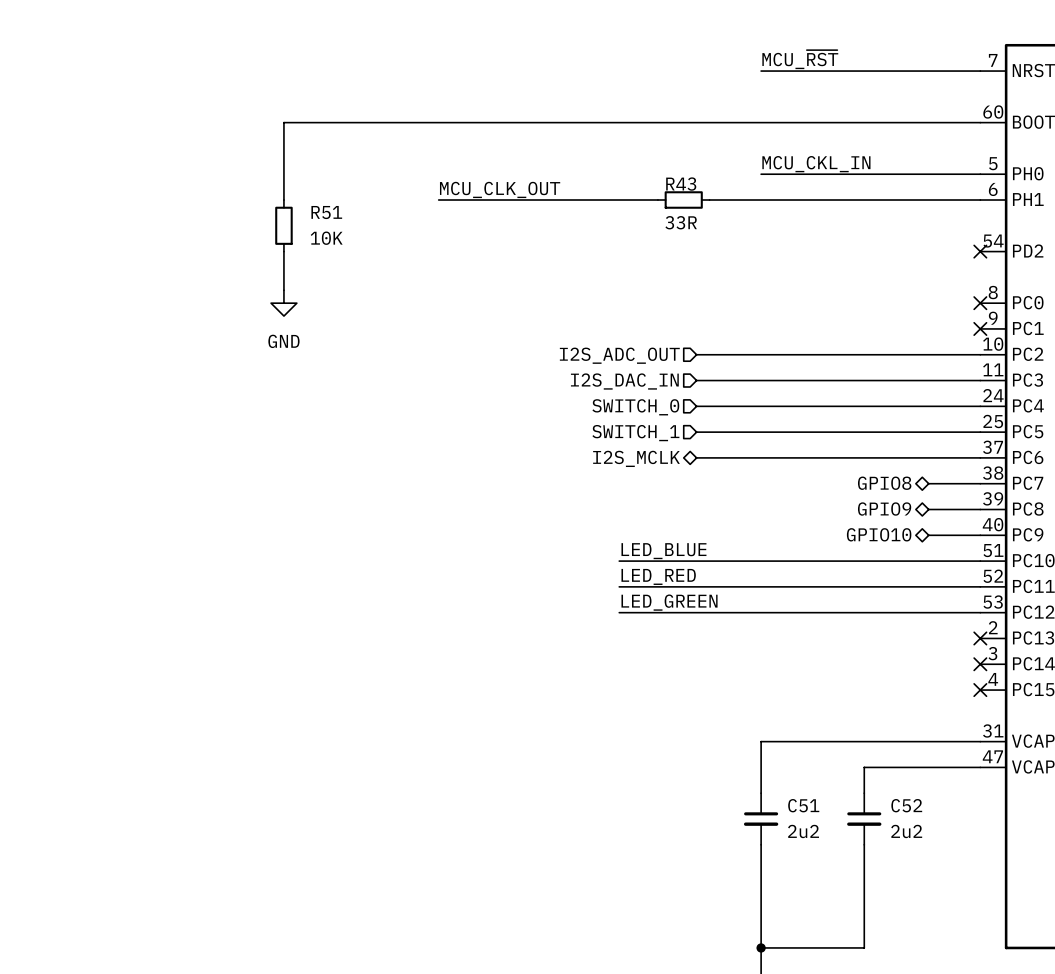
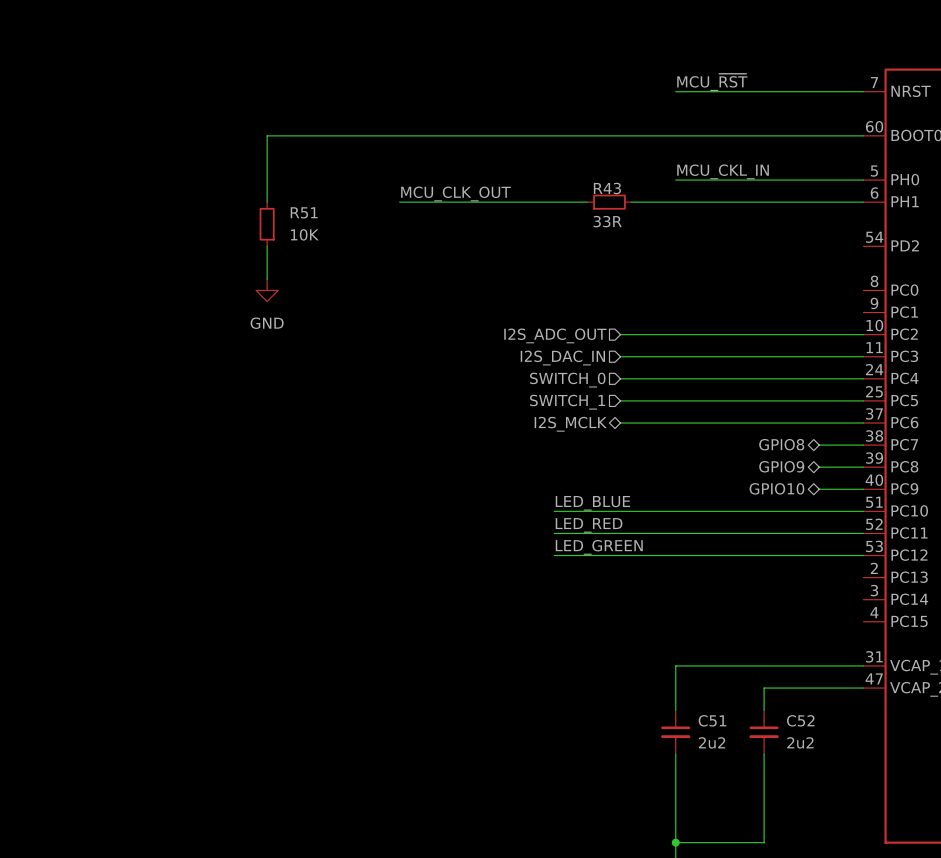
no-connect mark: (980, 251) -> none
no-connect mark: (980, 303) -> none
no-connect mark: (980, 328) -> none
no-connect mark: (980, 638) -> none
no-connect mark: (980, 664) -> none
no-connect mark: (980, 690) -> none

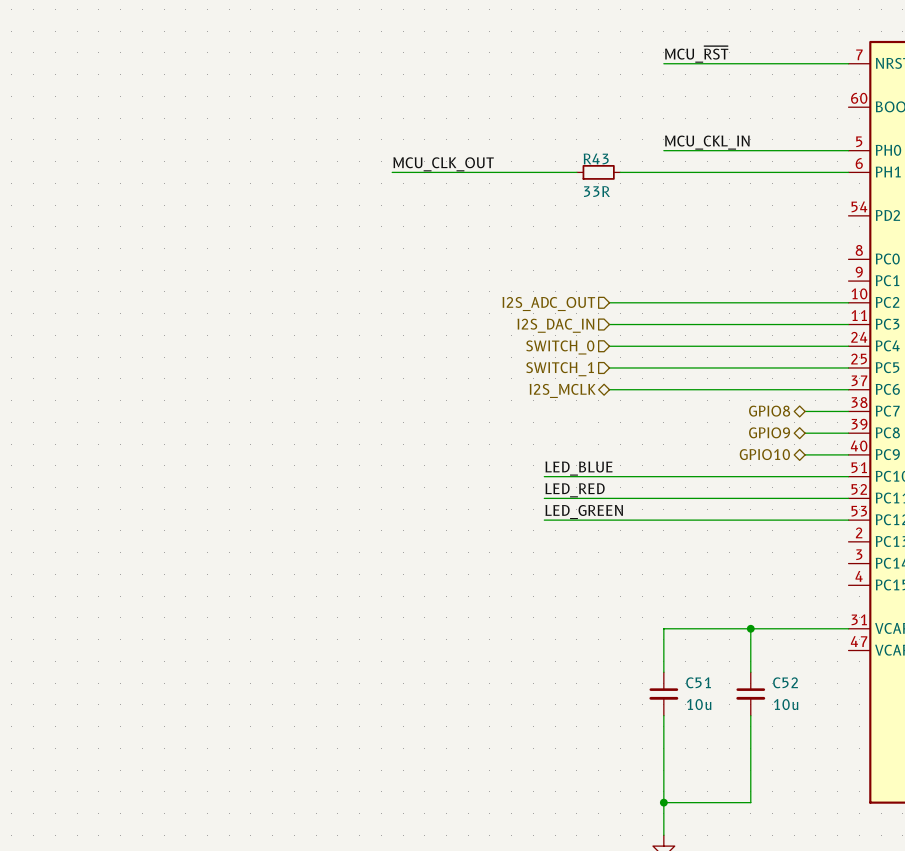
wire: (863, 135) (267, 135) (267, 202) -> none
R51: 10K (267, 224) -> none
wire: (267, 246) (267, 279) -> none
power symbol: GND (267, 290) -> none
junction: none -> (750, 628)
wire: (764, 688) (863, 688) -> (750, 650) (750, 628)
C51 value: 2u2 (712, 742) -> 10u (699, 704)
C52 value: 2u2 (800, 742) -> 10u (786, 704)

